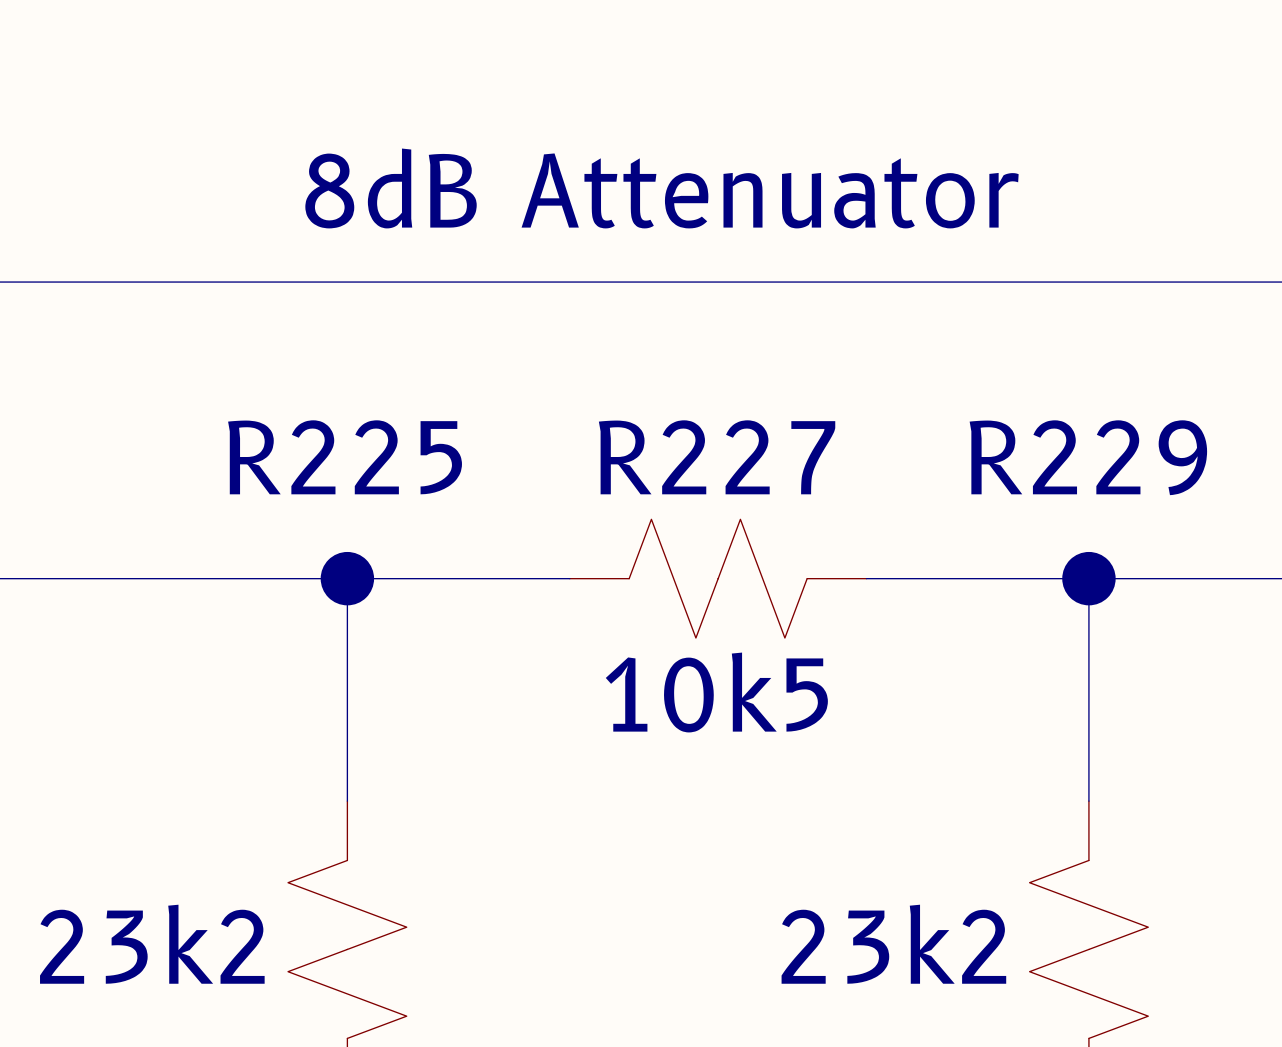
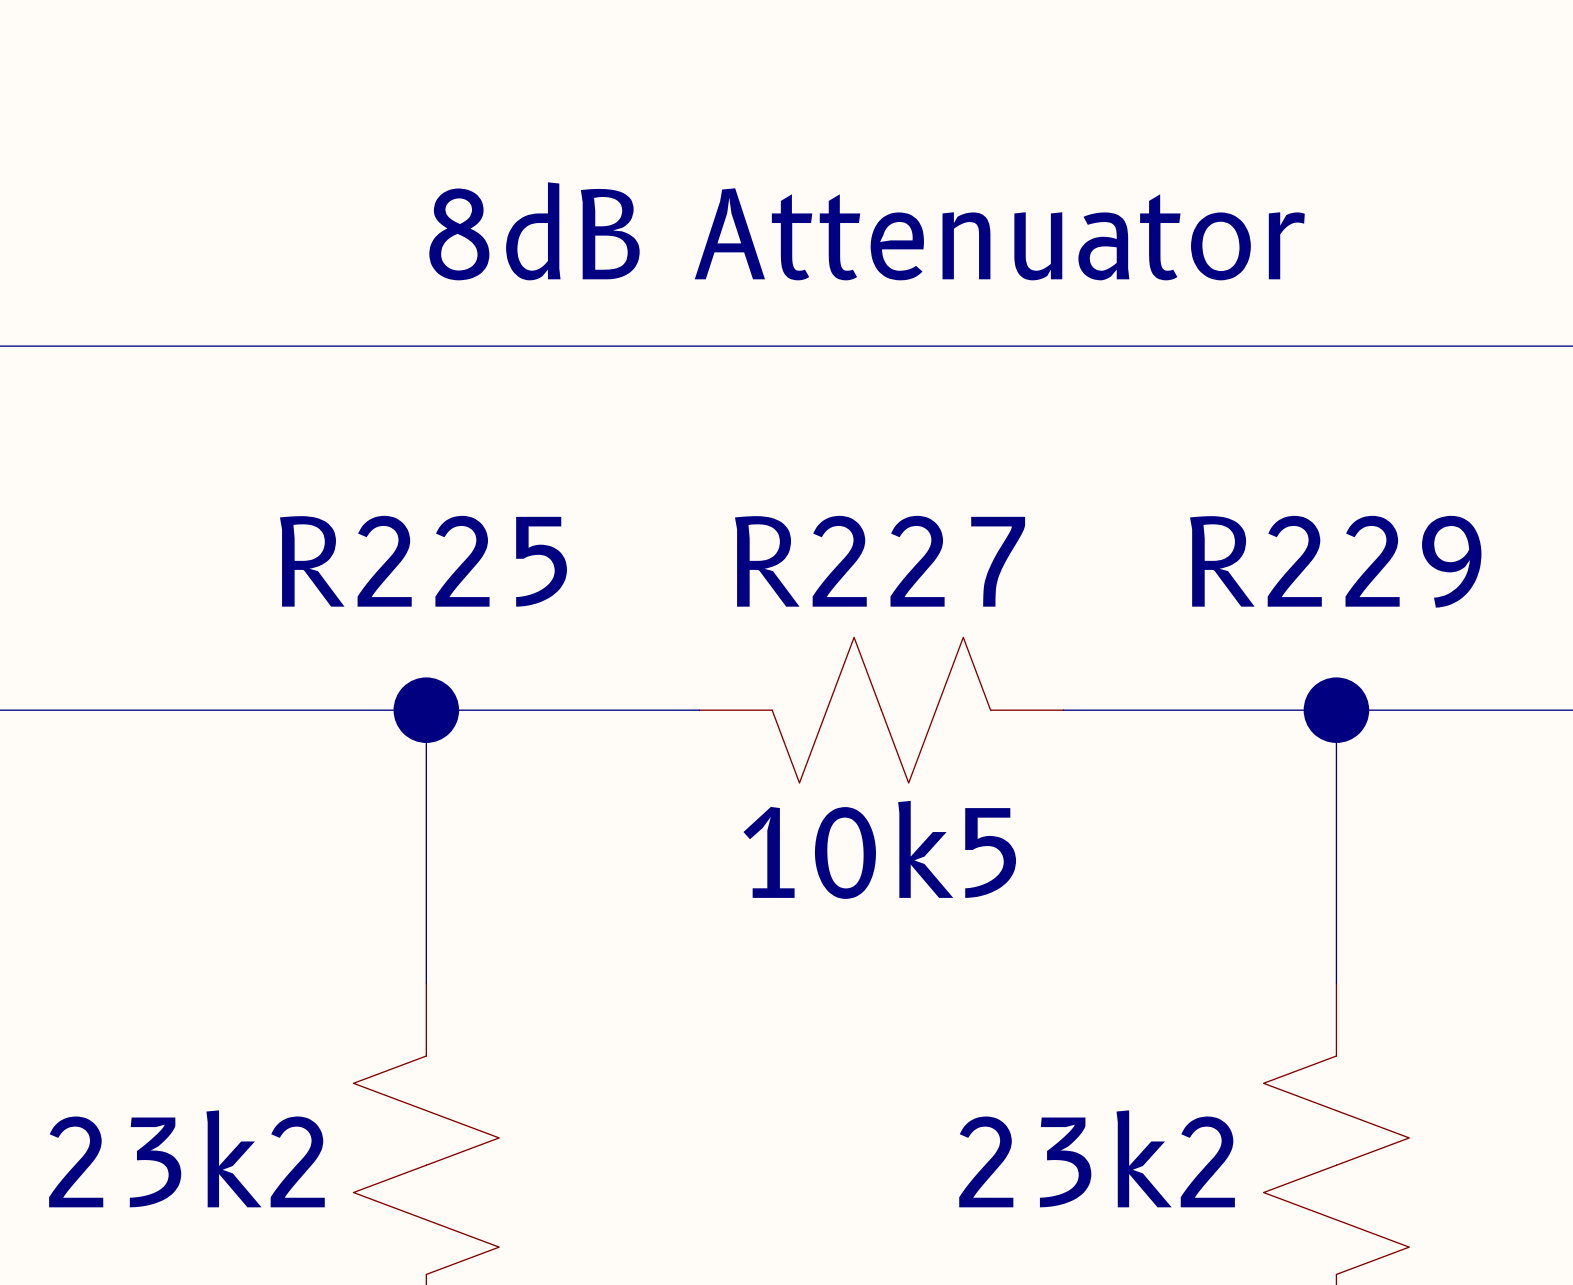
text position: 8dB Attenuator (661, 188) -> 8dB Attenuator (867, 231)
R227 flip: as is (718, 578) -> left-right (881, 710)

